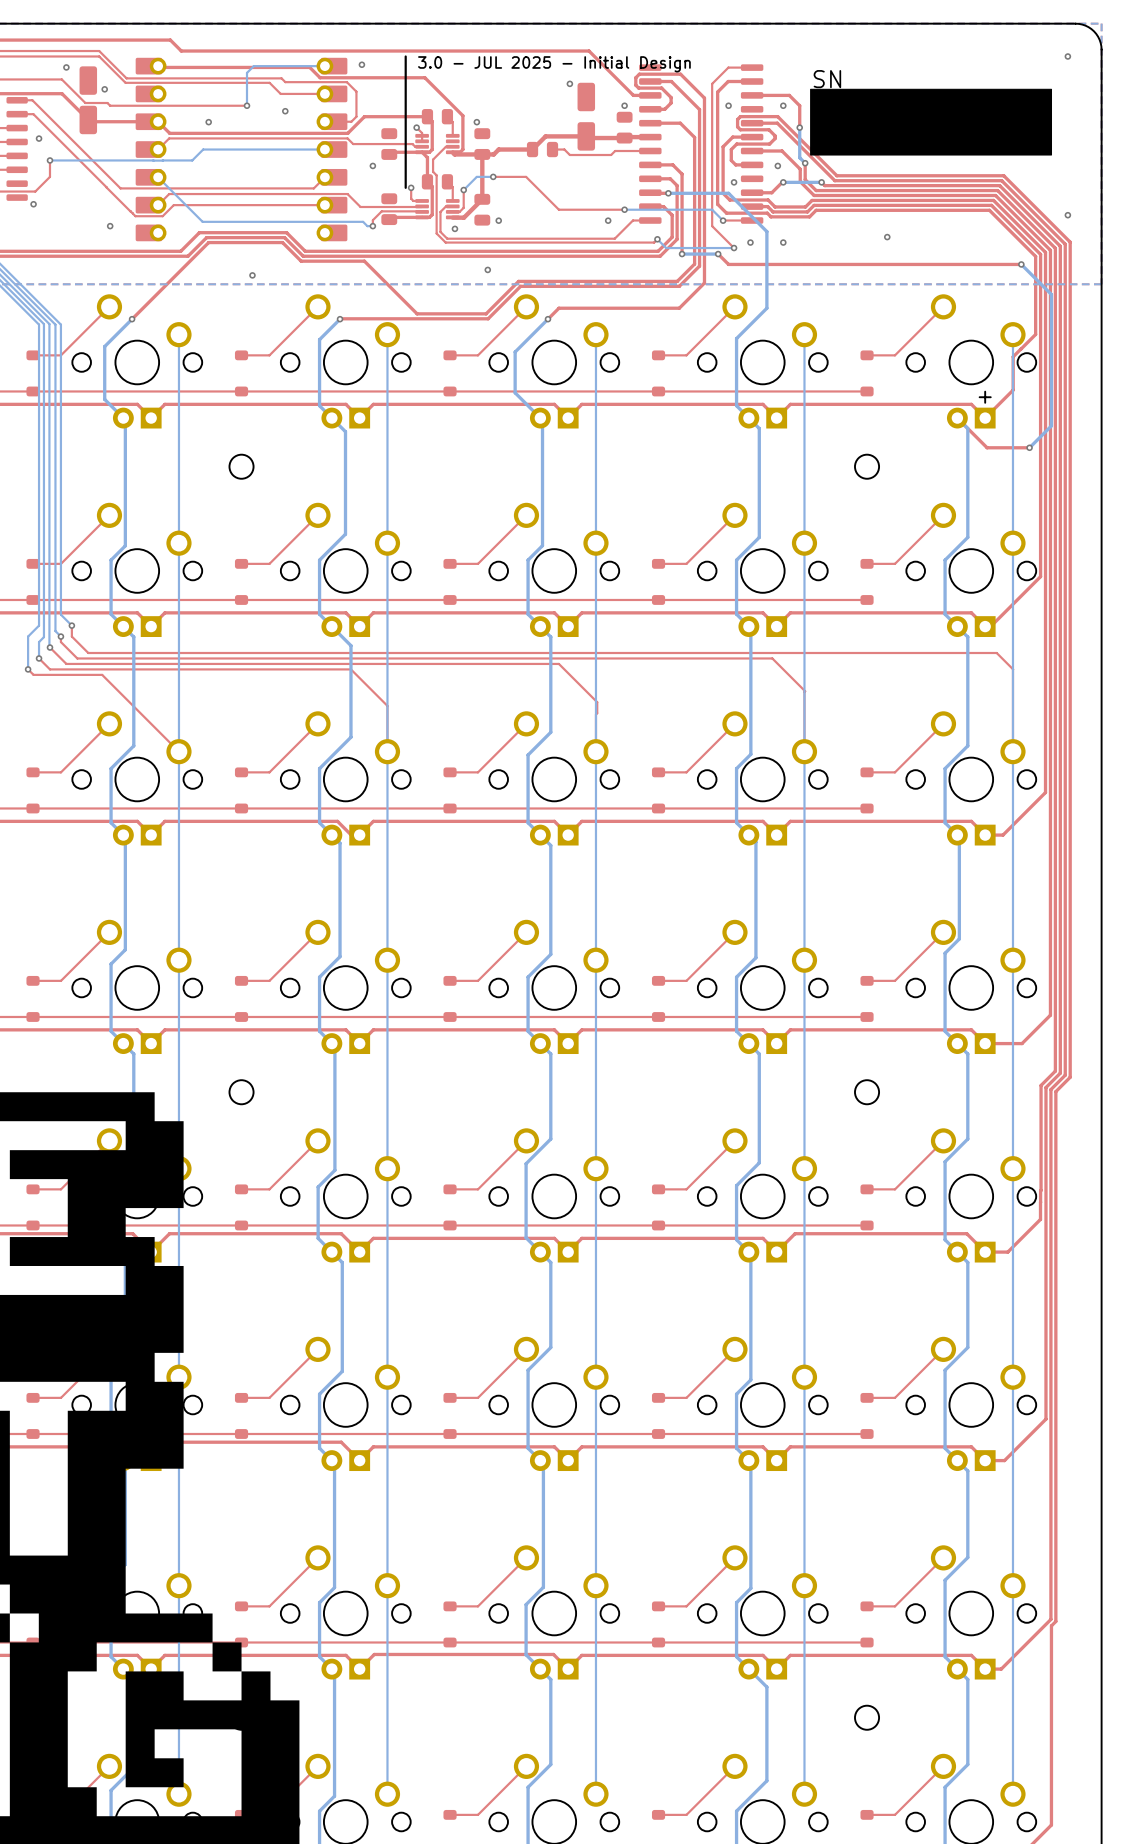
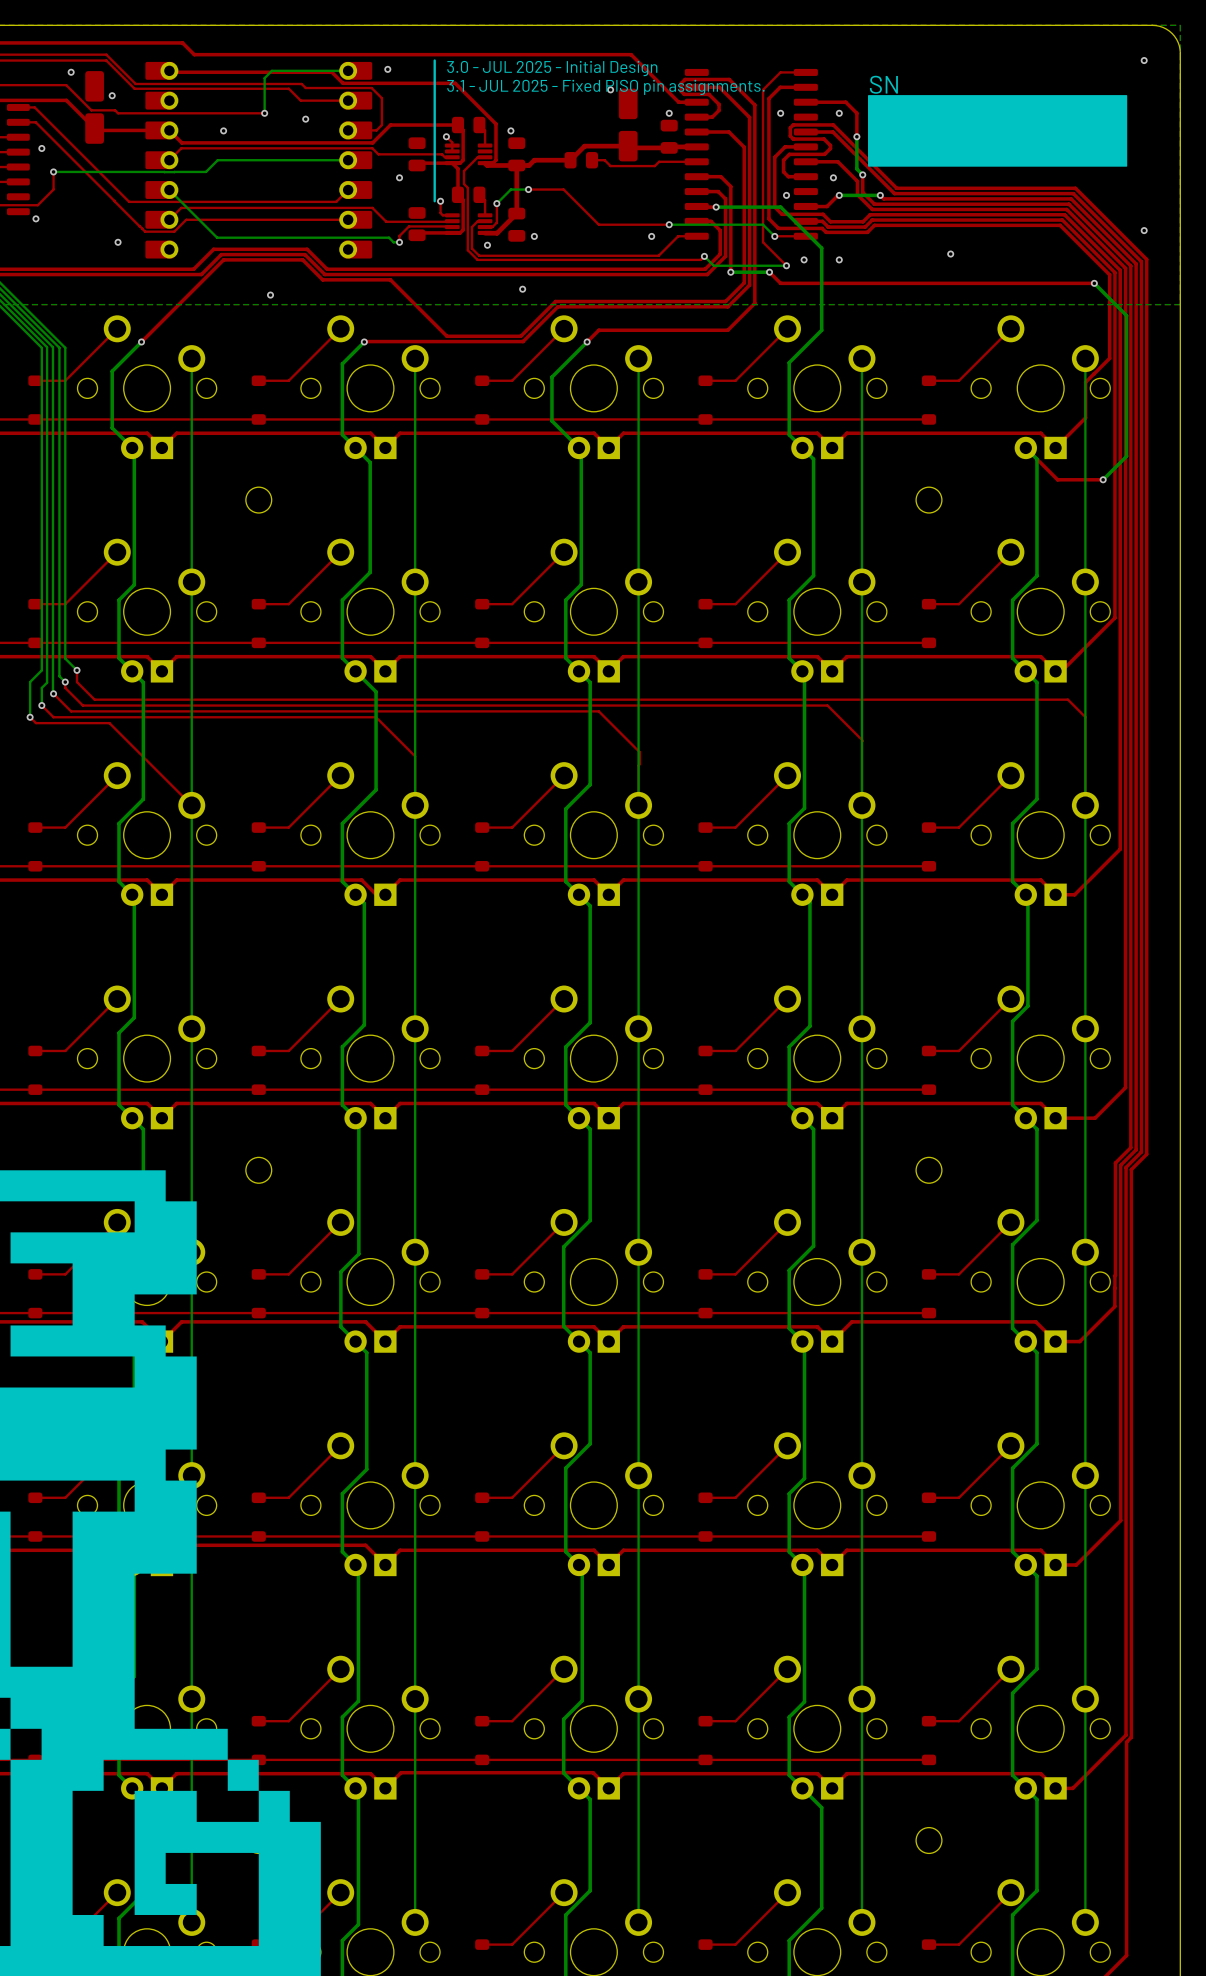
text: none -> 3.1 - JUL 2025 - Fixed PISO pin assignments. (605, 87)
part footprint: [946, 391, 996, 429] -> [1014, 436, 1067, 460]

